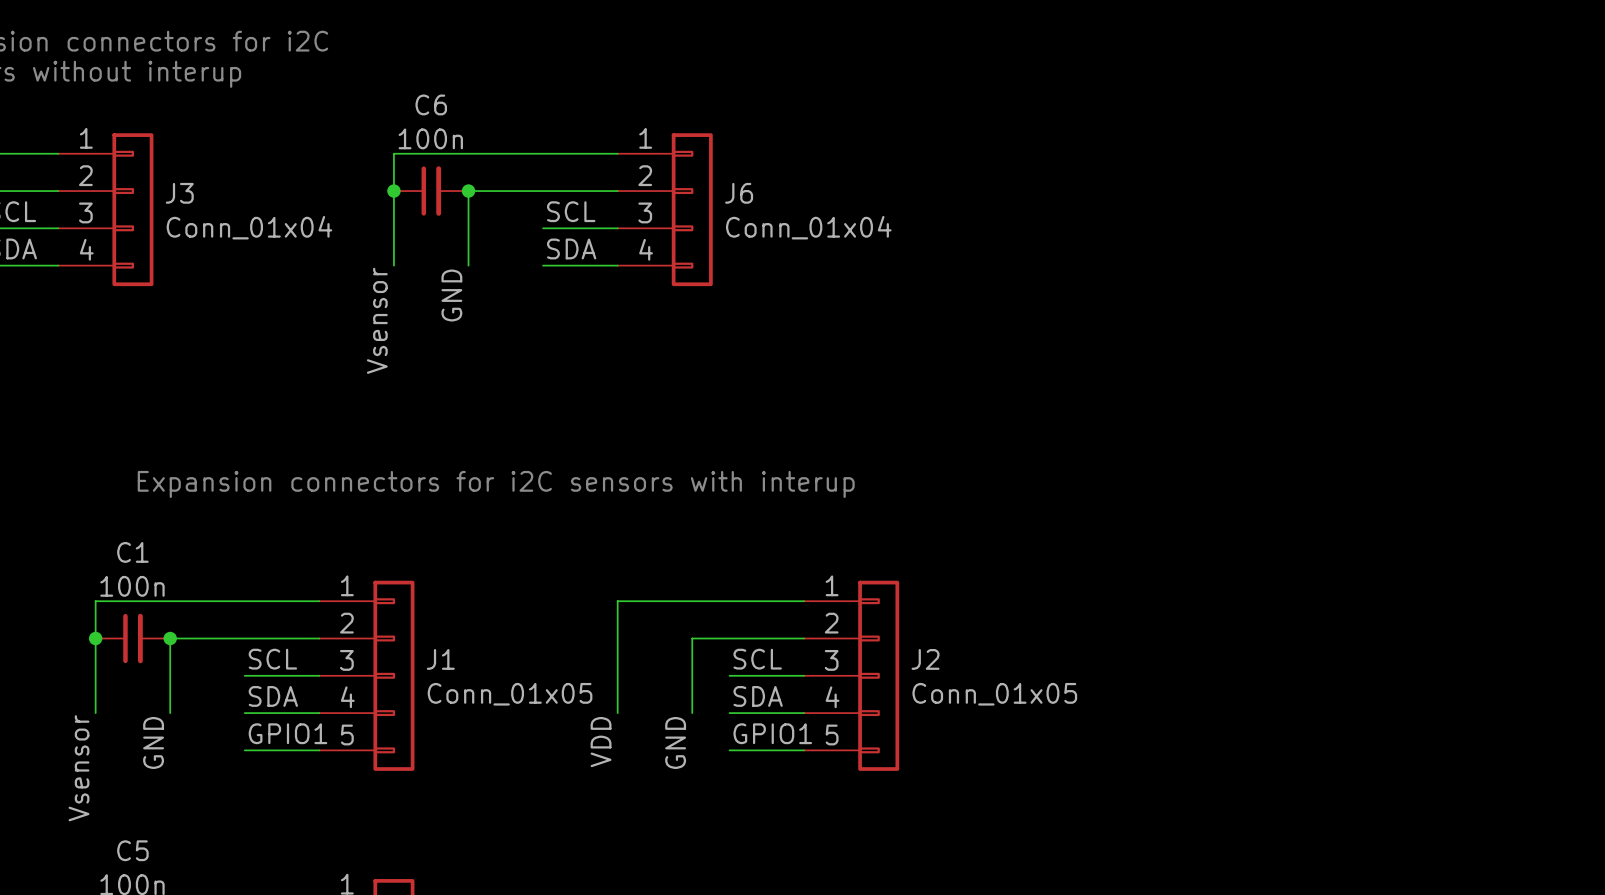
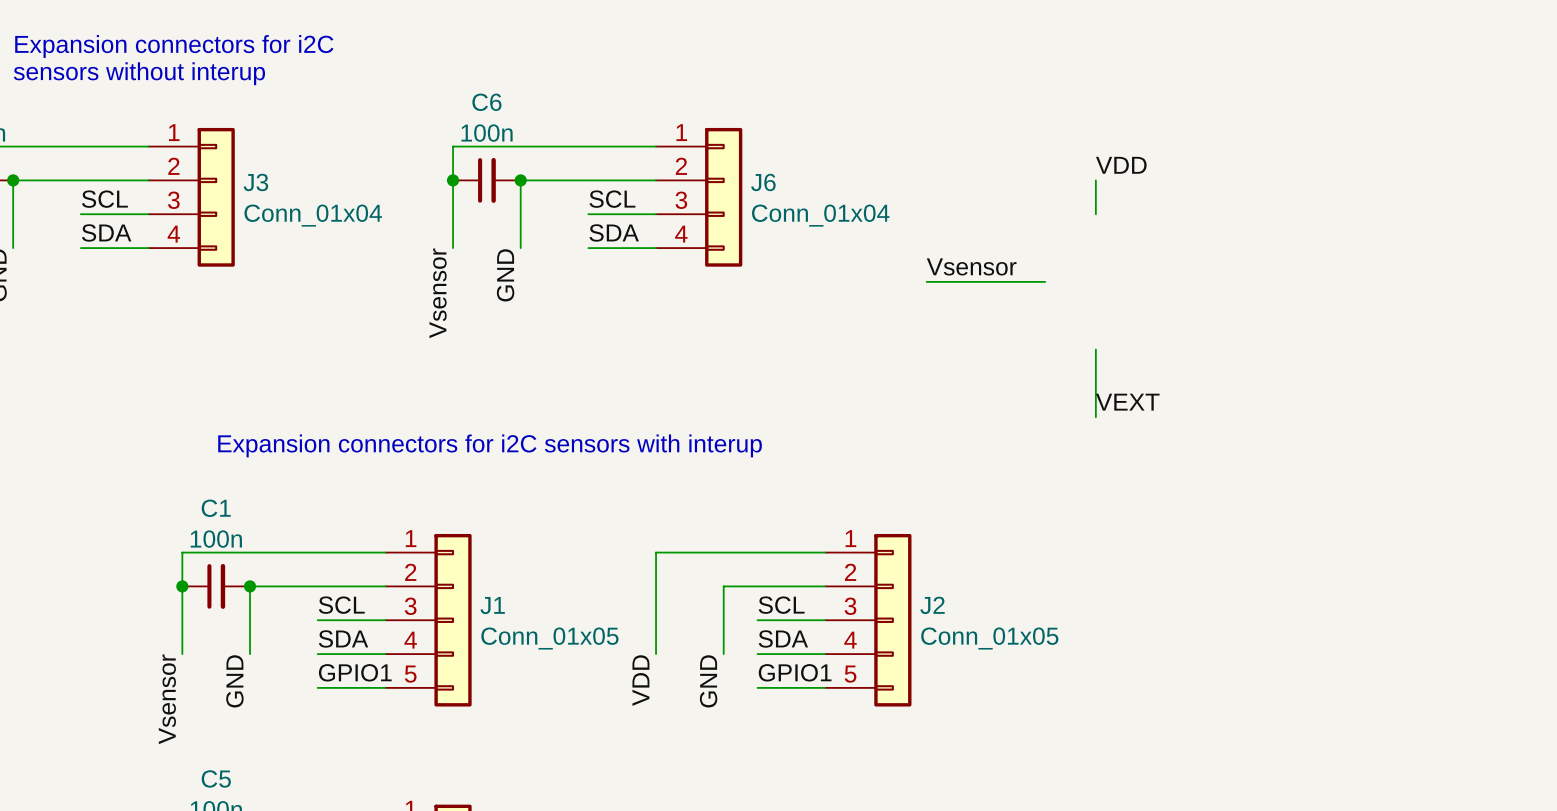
label: none -> VDD (1121, 165)
wire: none -> (1095, 180) (1095, 214)
label: none -> Vsensor (971, 266)
wire: none -> (926, 281) (1045, 281)
wire: none -> (1095, 349) (1095, 417)
label: none -> VEXT (1127, 402)

